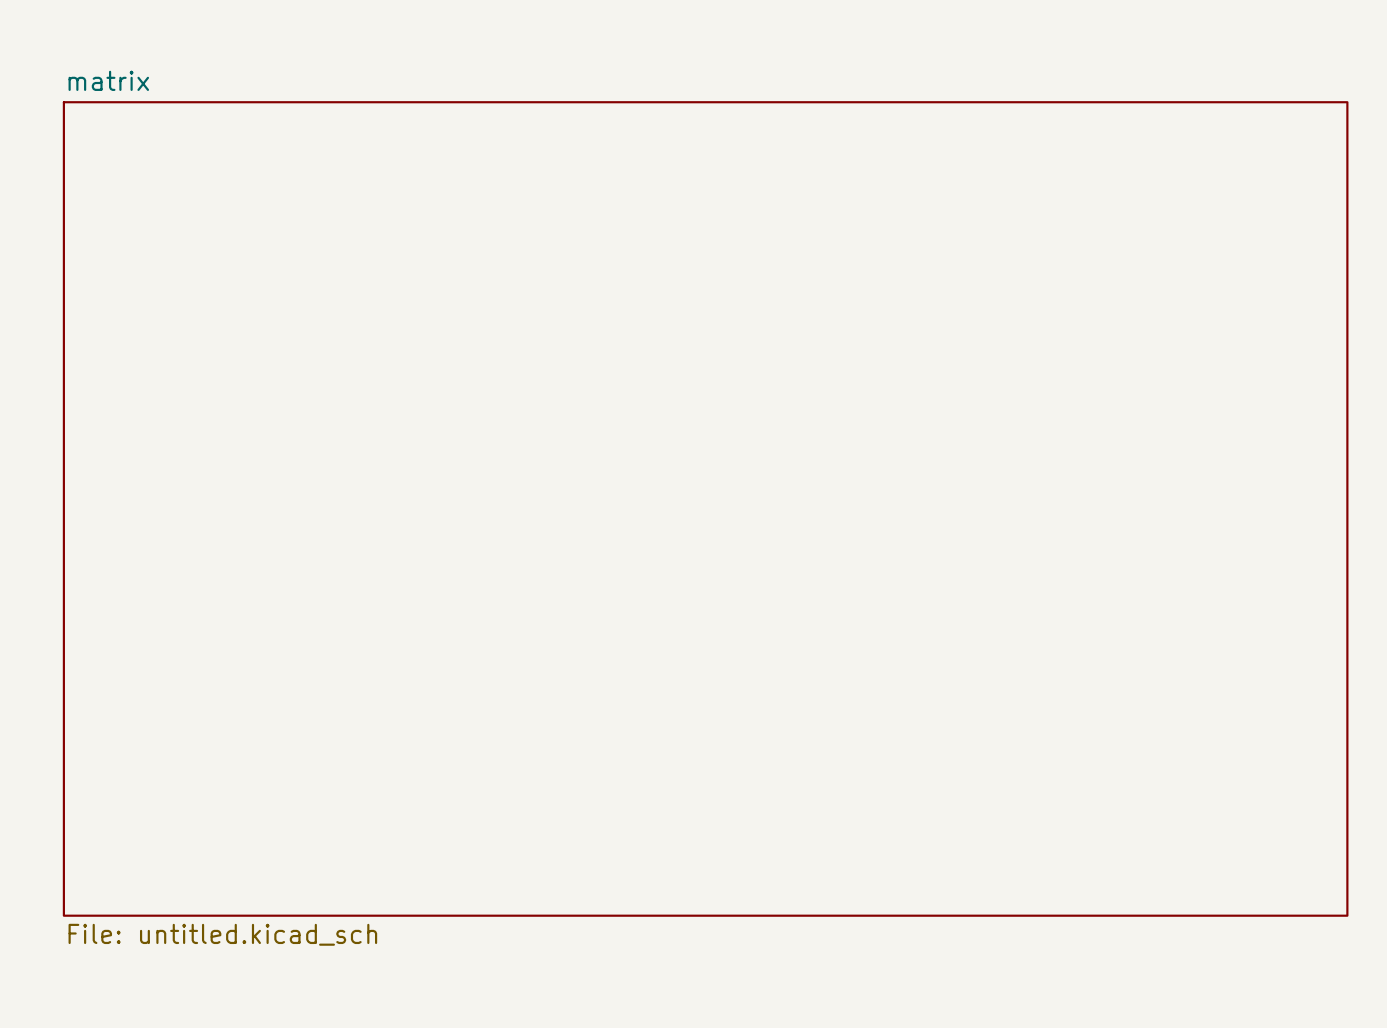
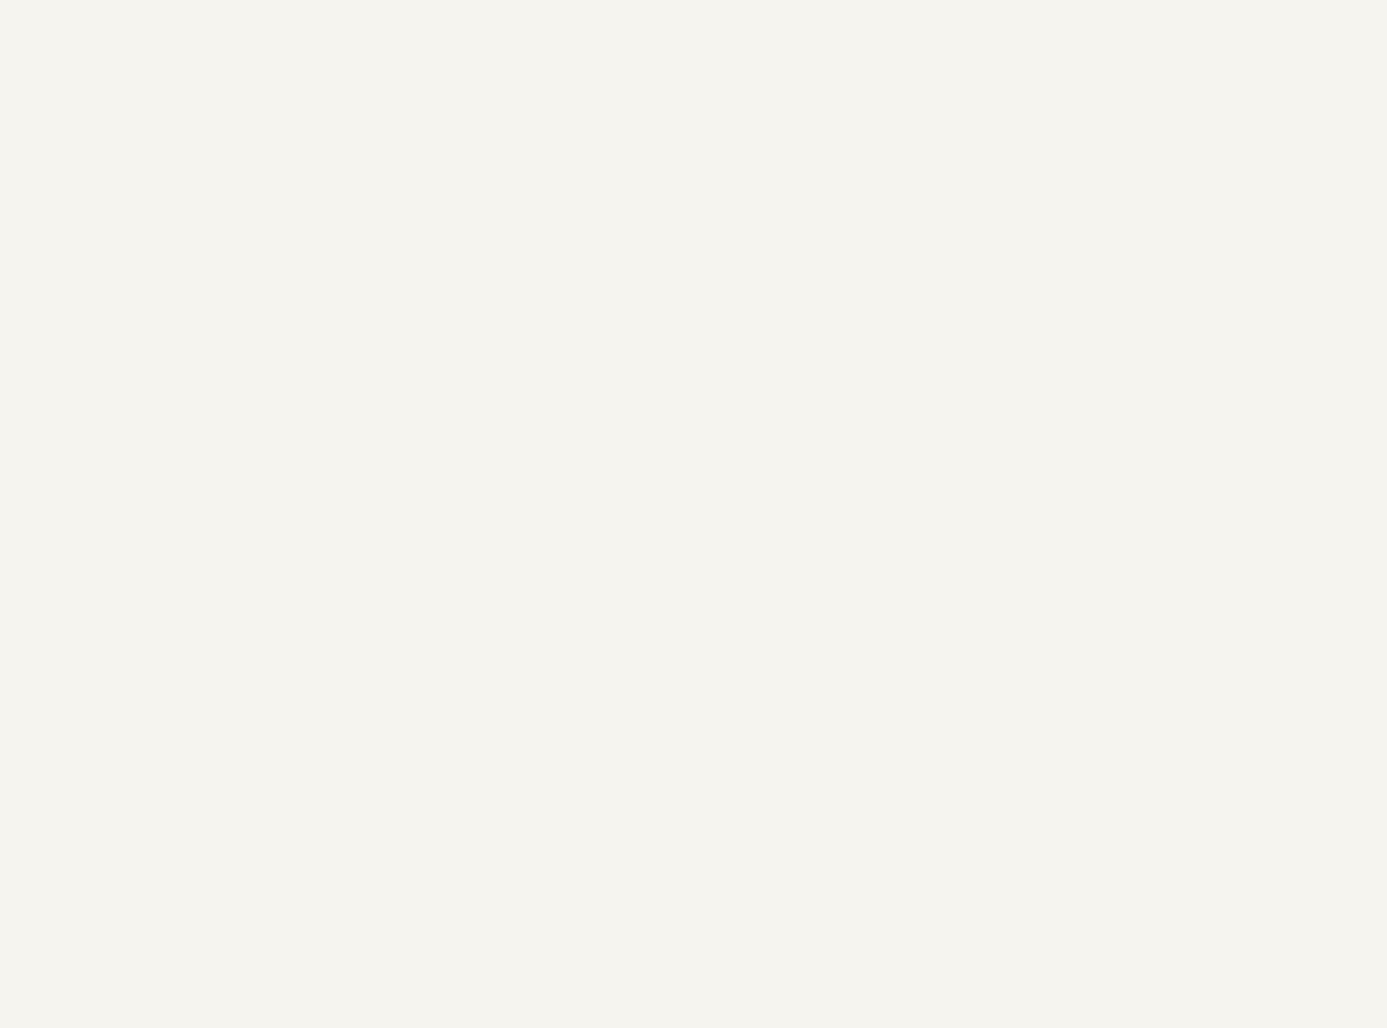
sheet matrix: File: untitled.kicad_sch (705, 508) -> none

